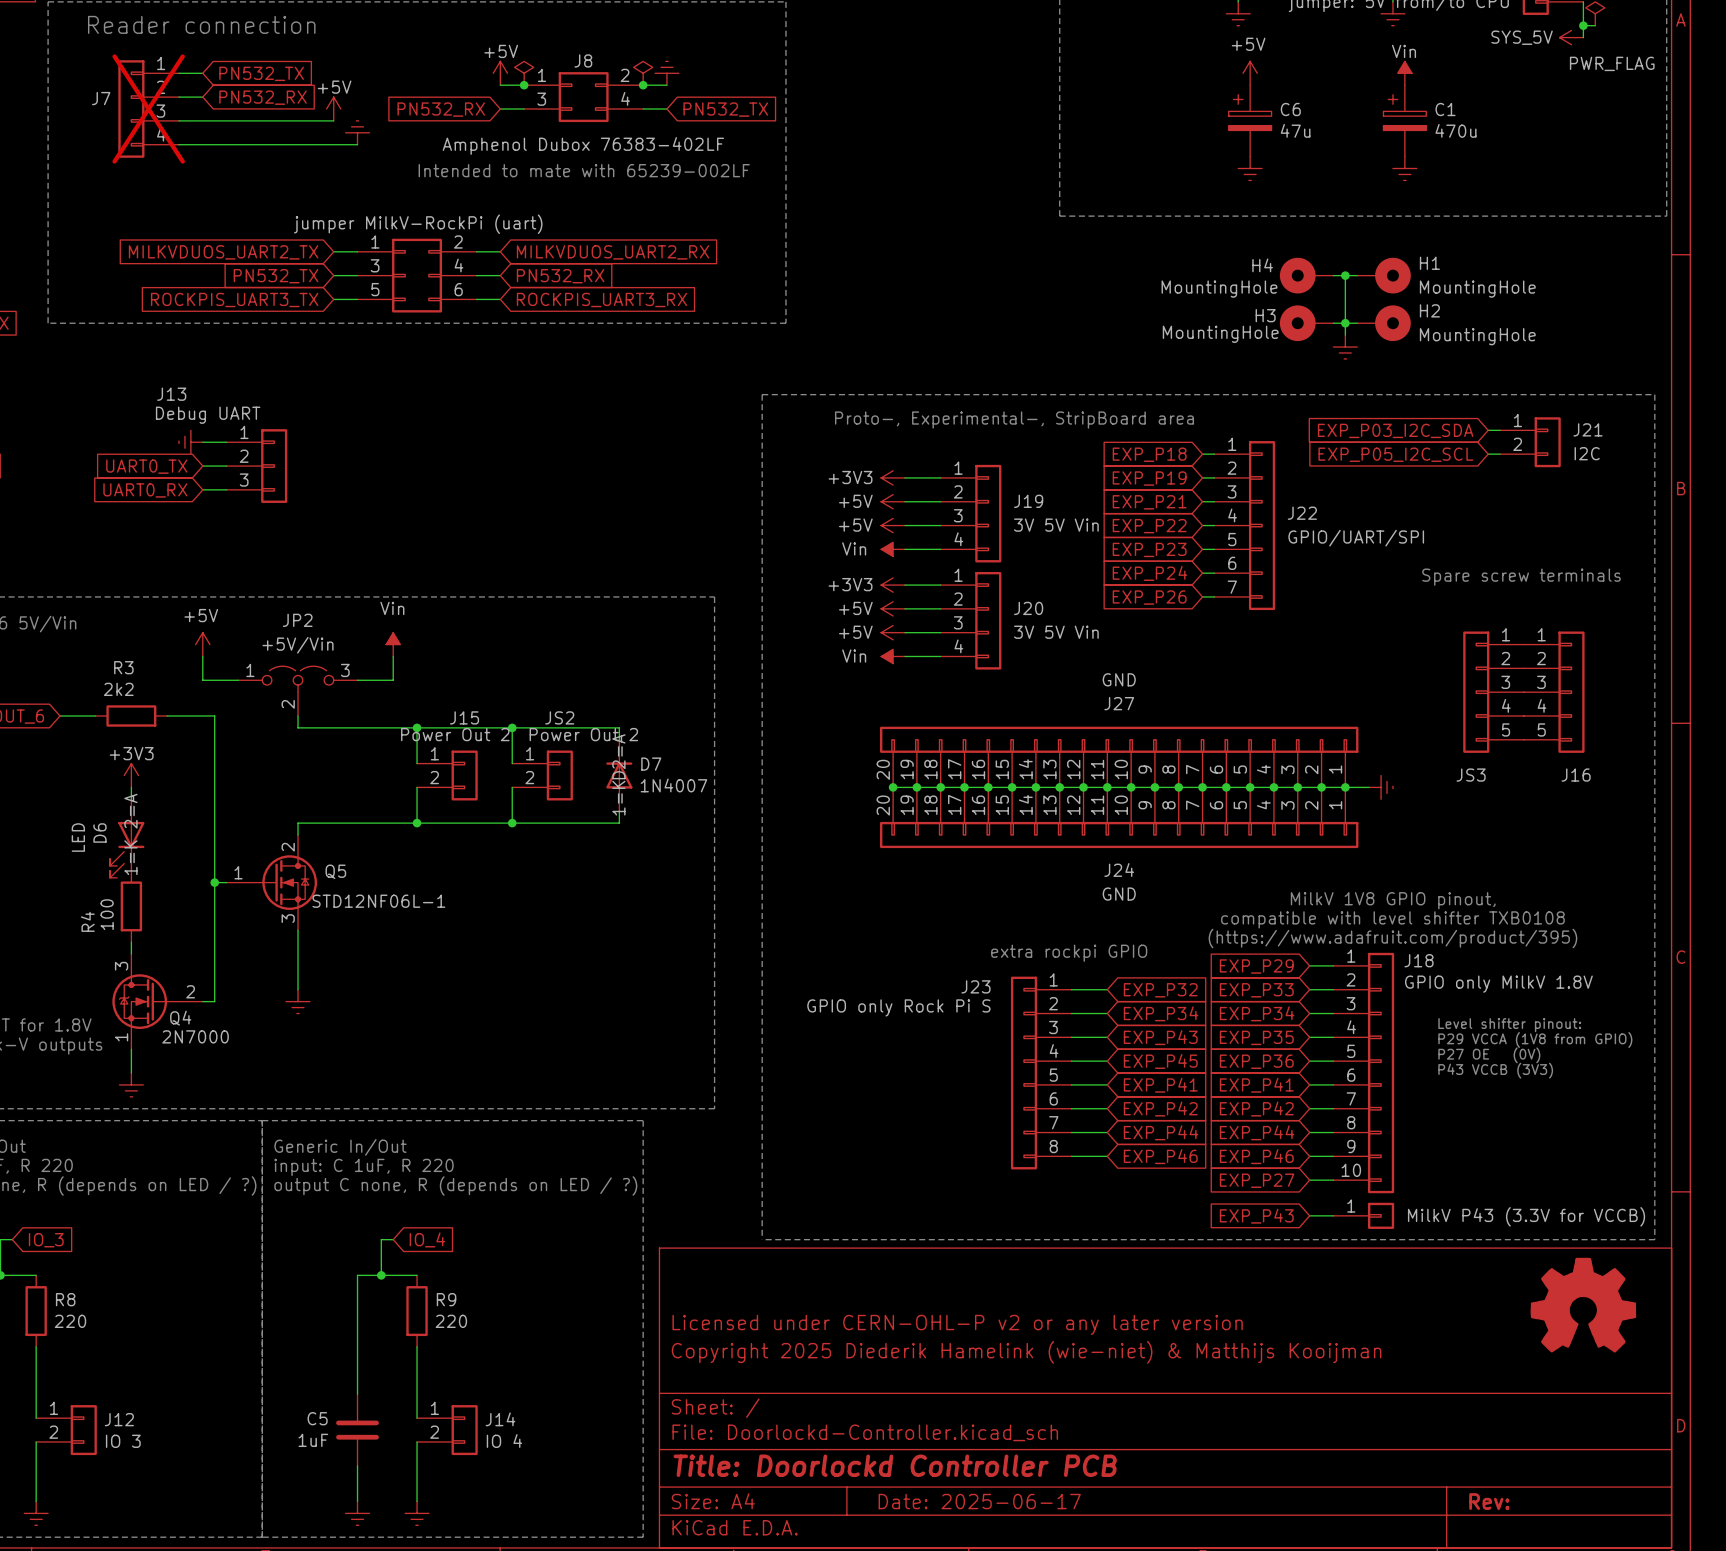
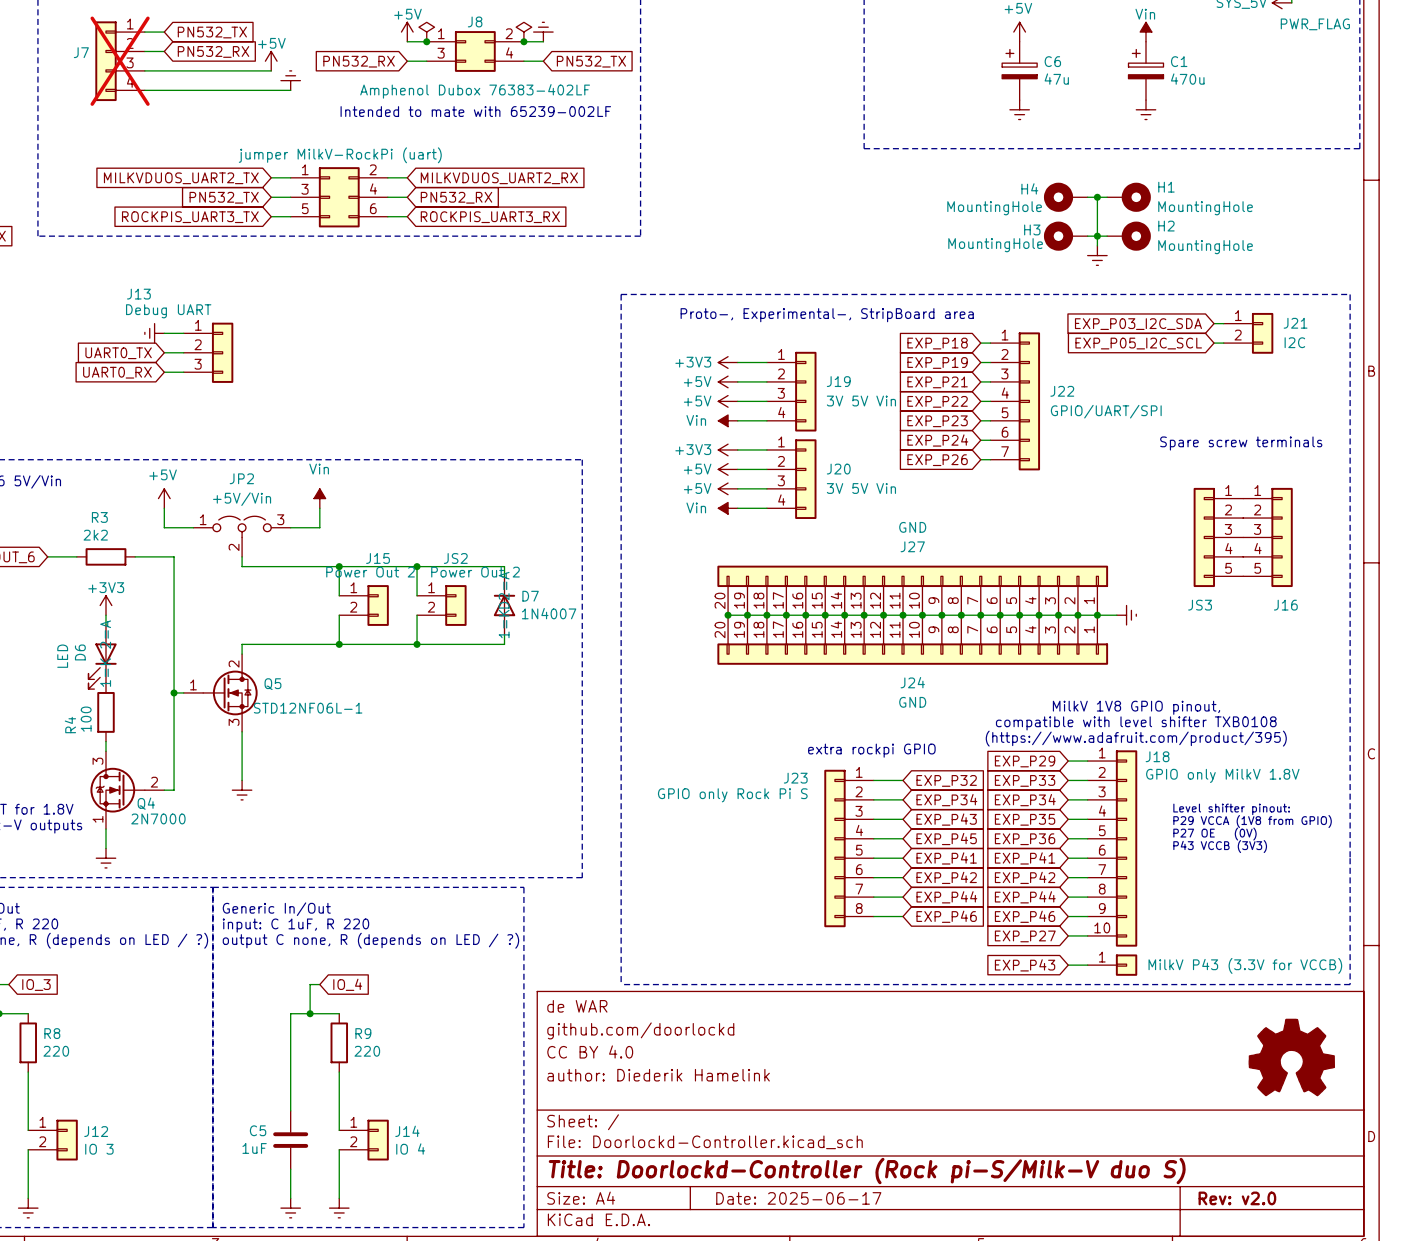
title block: none -> de WAR (577, 1006)
title block: none -> github.com/doorlockd (640, 1030)
power symbol position: (1583, 1305) -> (1291, 1057)
title block: Licensed under CERN-OHL-P v2 or any later version (957, 1324) -> CC BY 4.0 (590, 1051)
title block: Copyright 2025 Diederik Hamelink (wie-niet) & Matthijs Kooijman (1026, 1352) -> author: Diederik Hamelink (658, 1075)
title block: Title: Doorlockd Controller PCB (895, 1465) -> Title: Doorlockd-Controller (Rock pi-S/Milk-V duo S) (867, 1171)
title block: Rev: (1489, 1501) -> Rev: v2.0 (1237, 1198)

